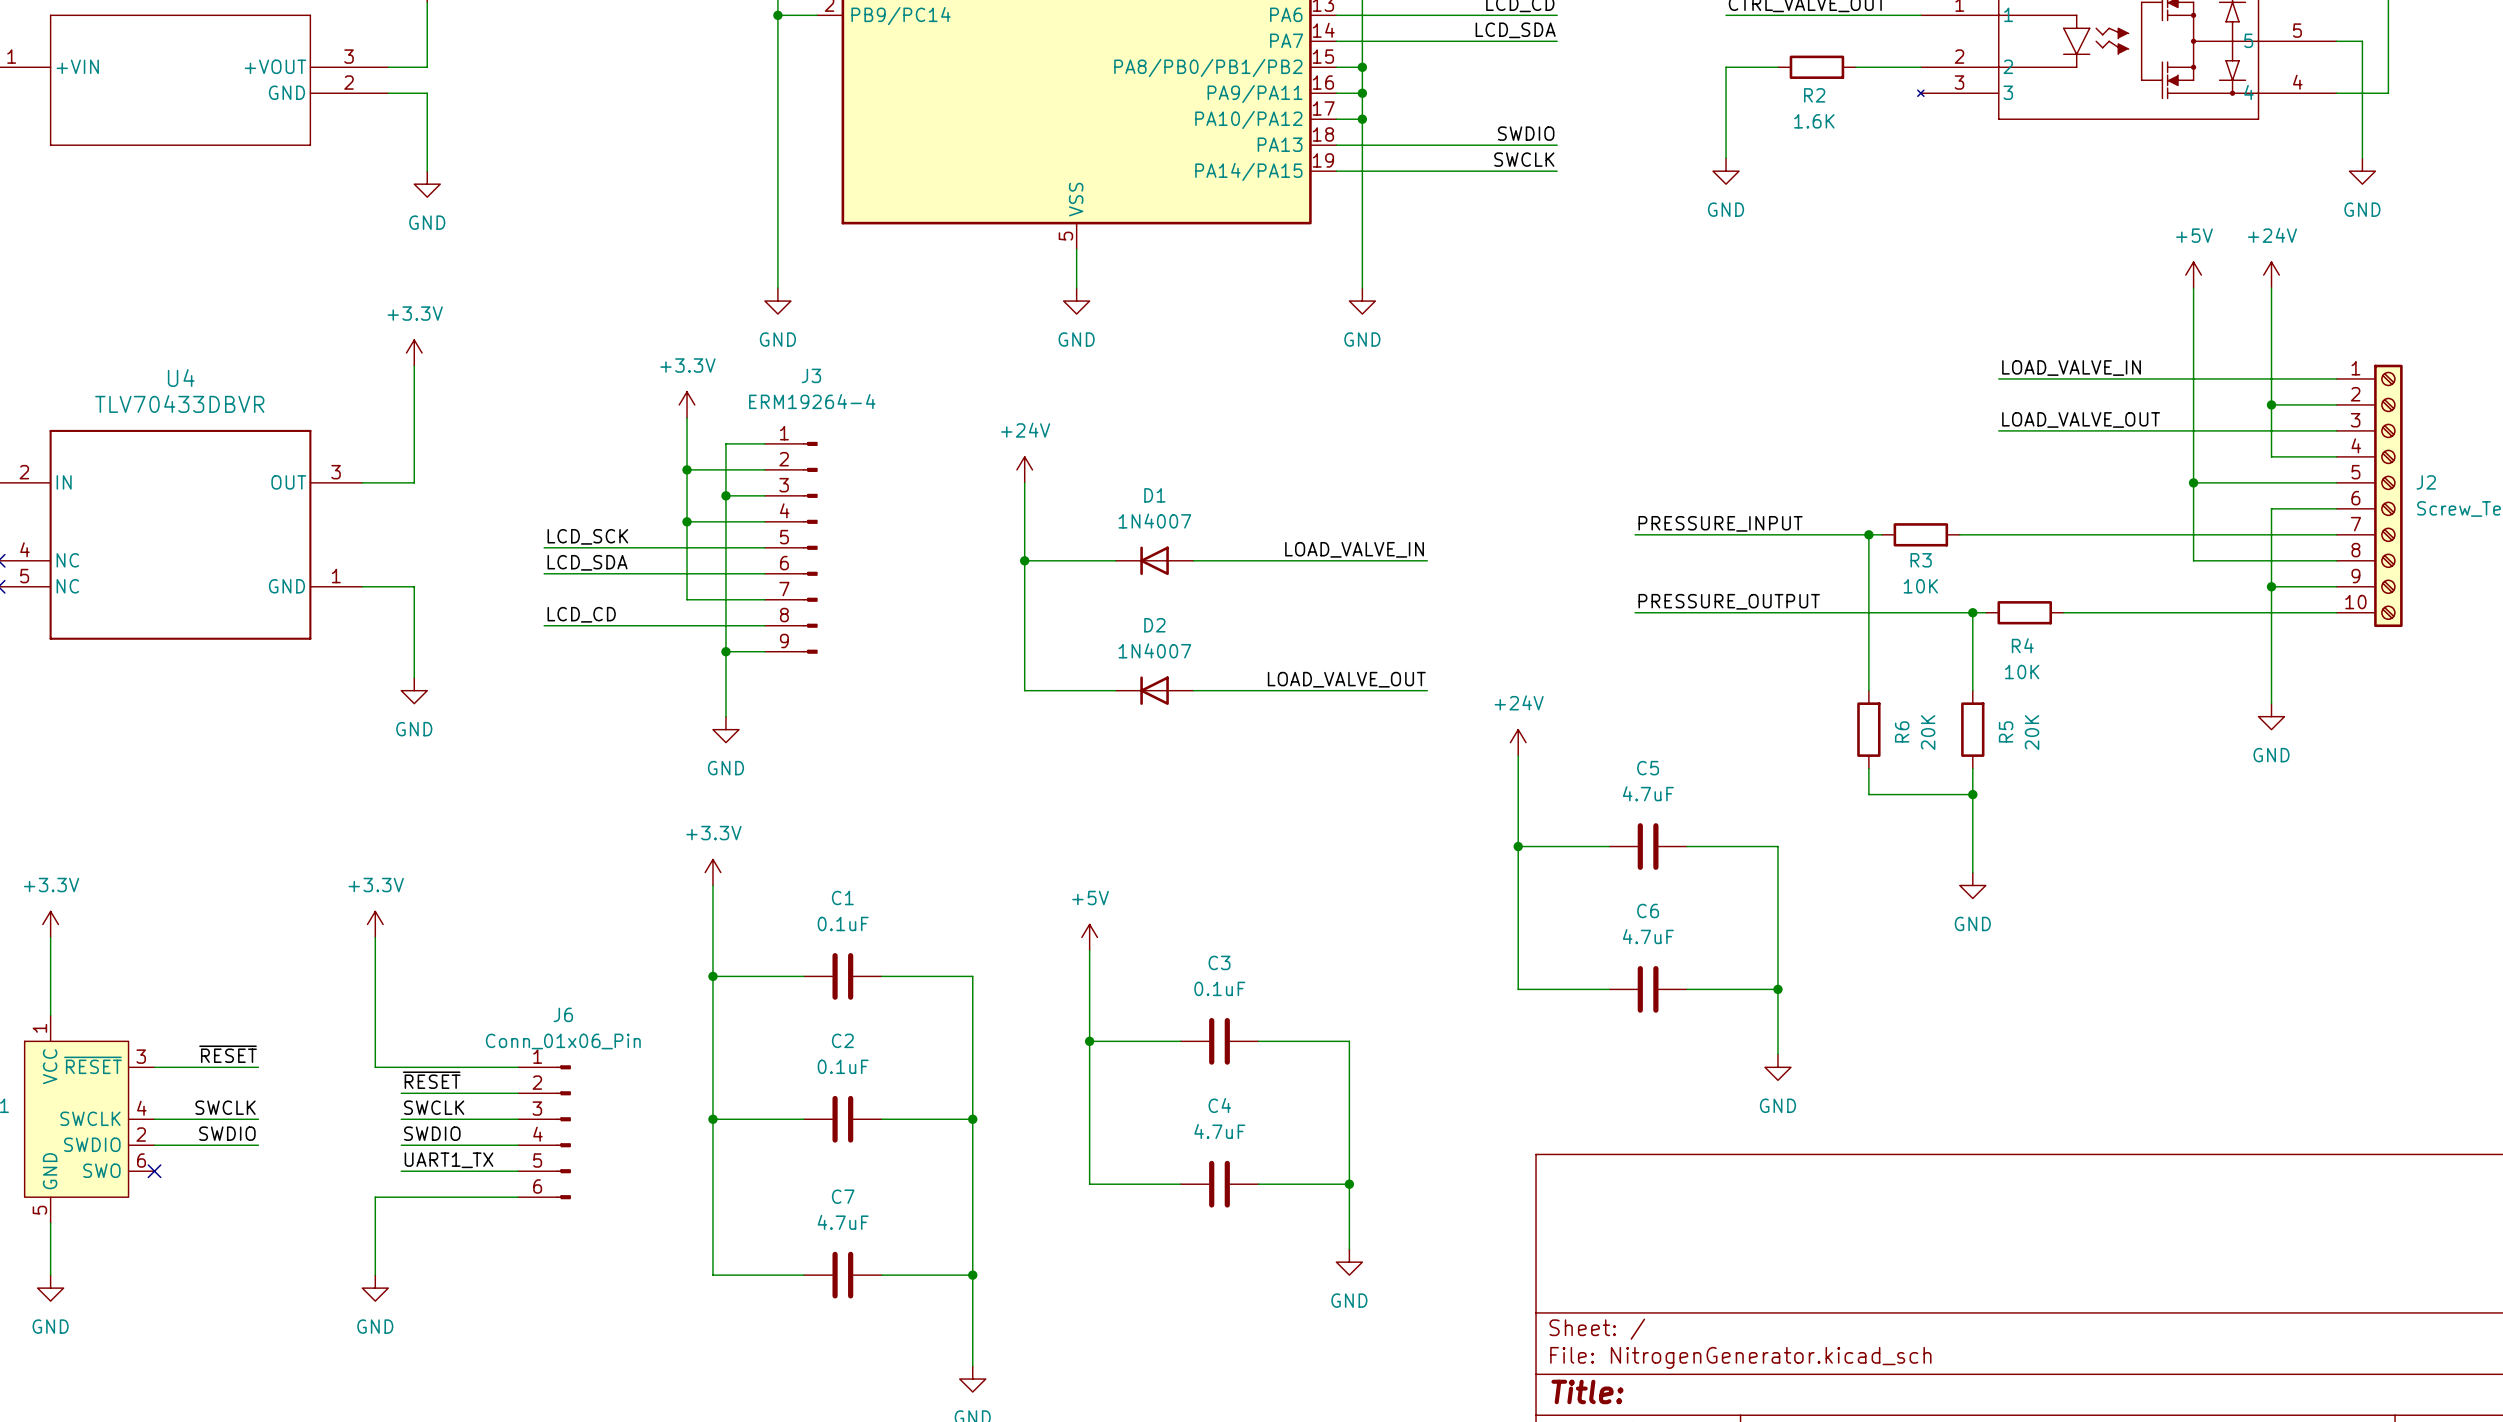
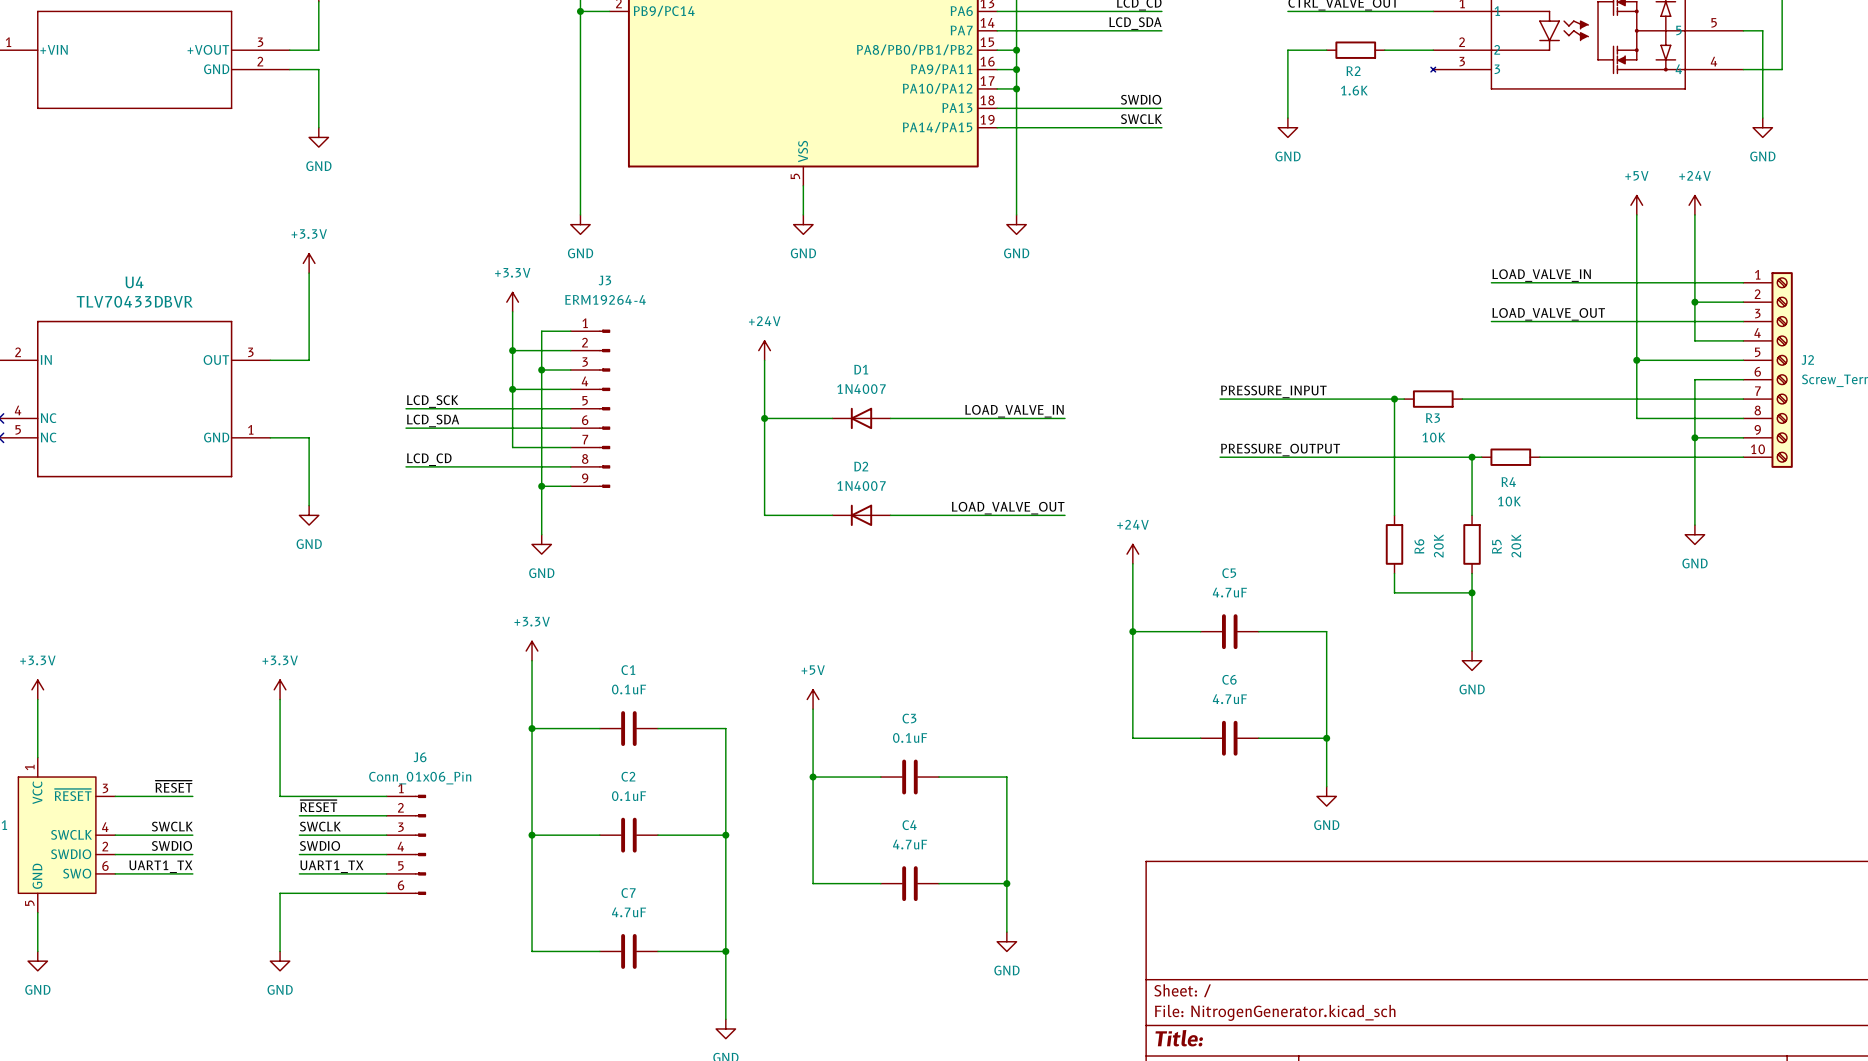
label: none -> UART1_TX (160, 866)
wire: none -> (115, 873) (192, 873)
no-connect mark: (154, 1171) -> none

